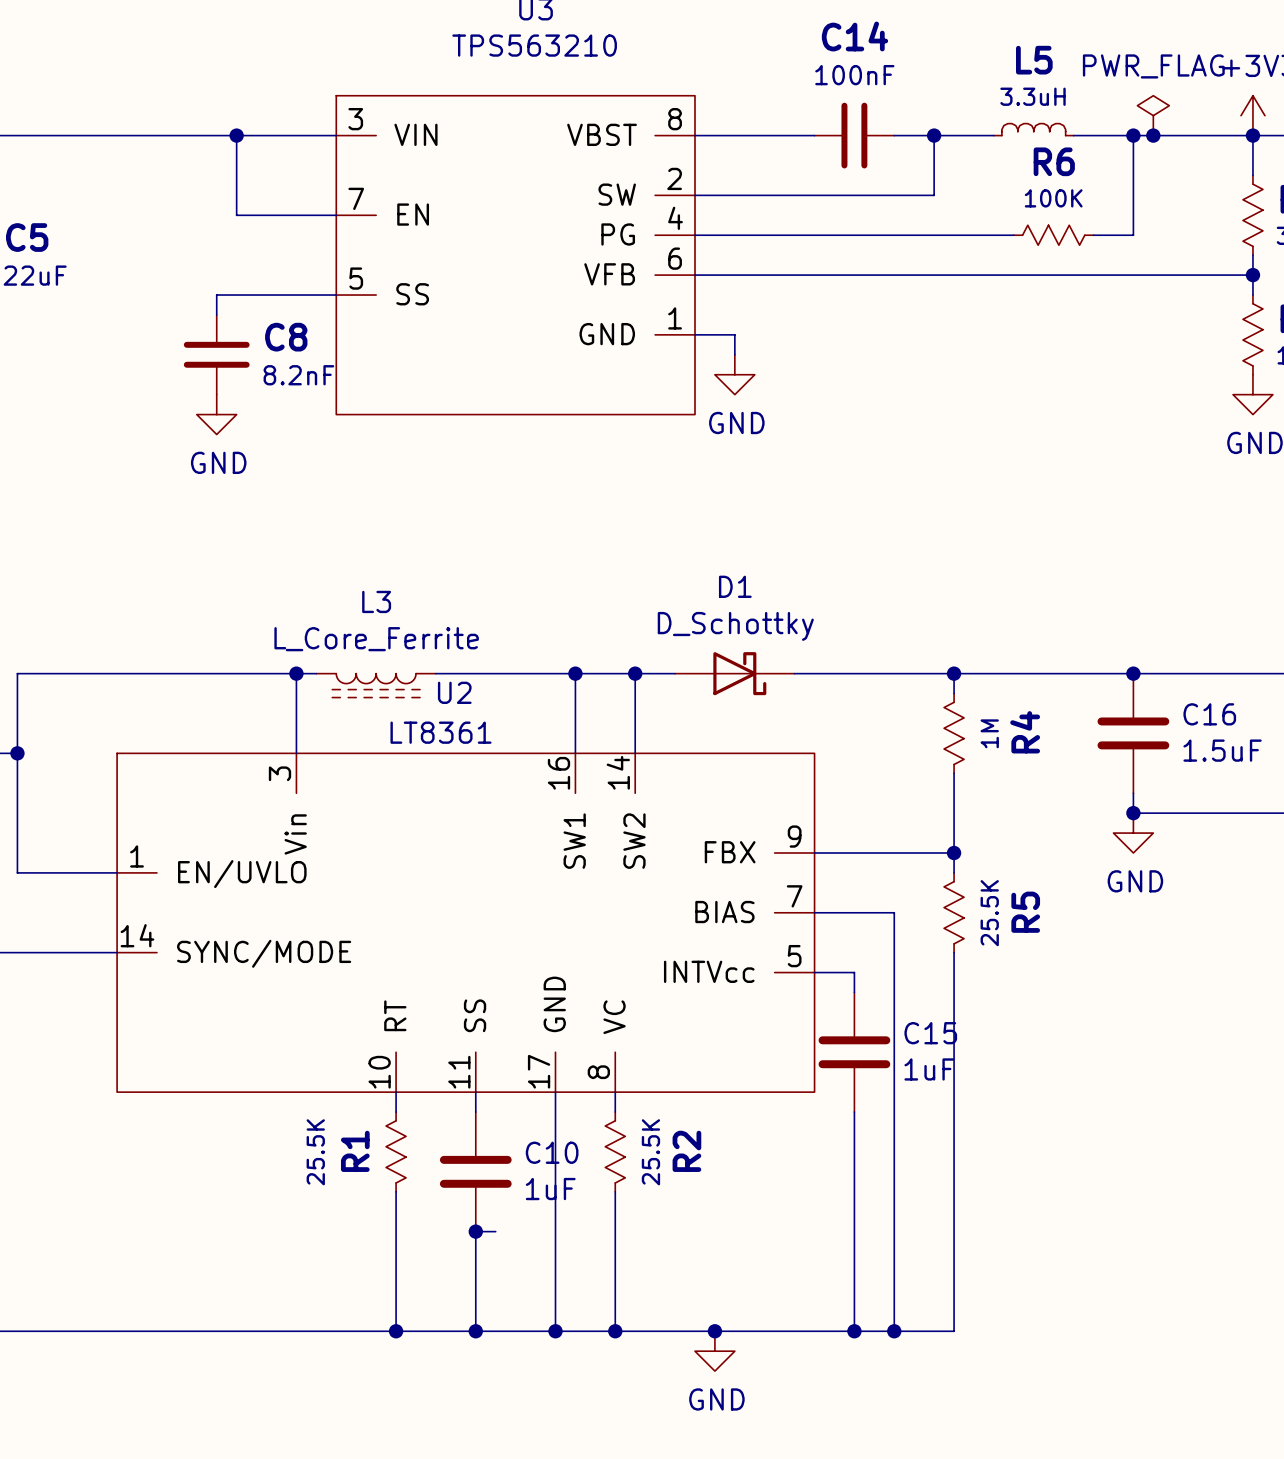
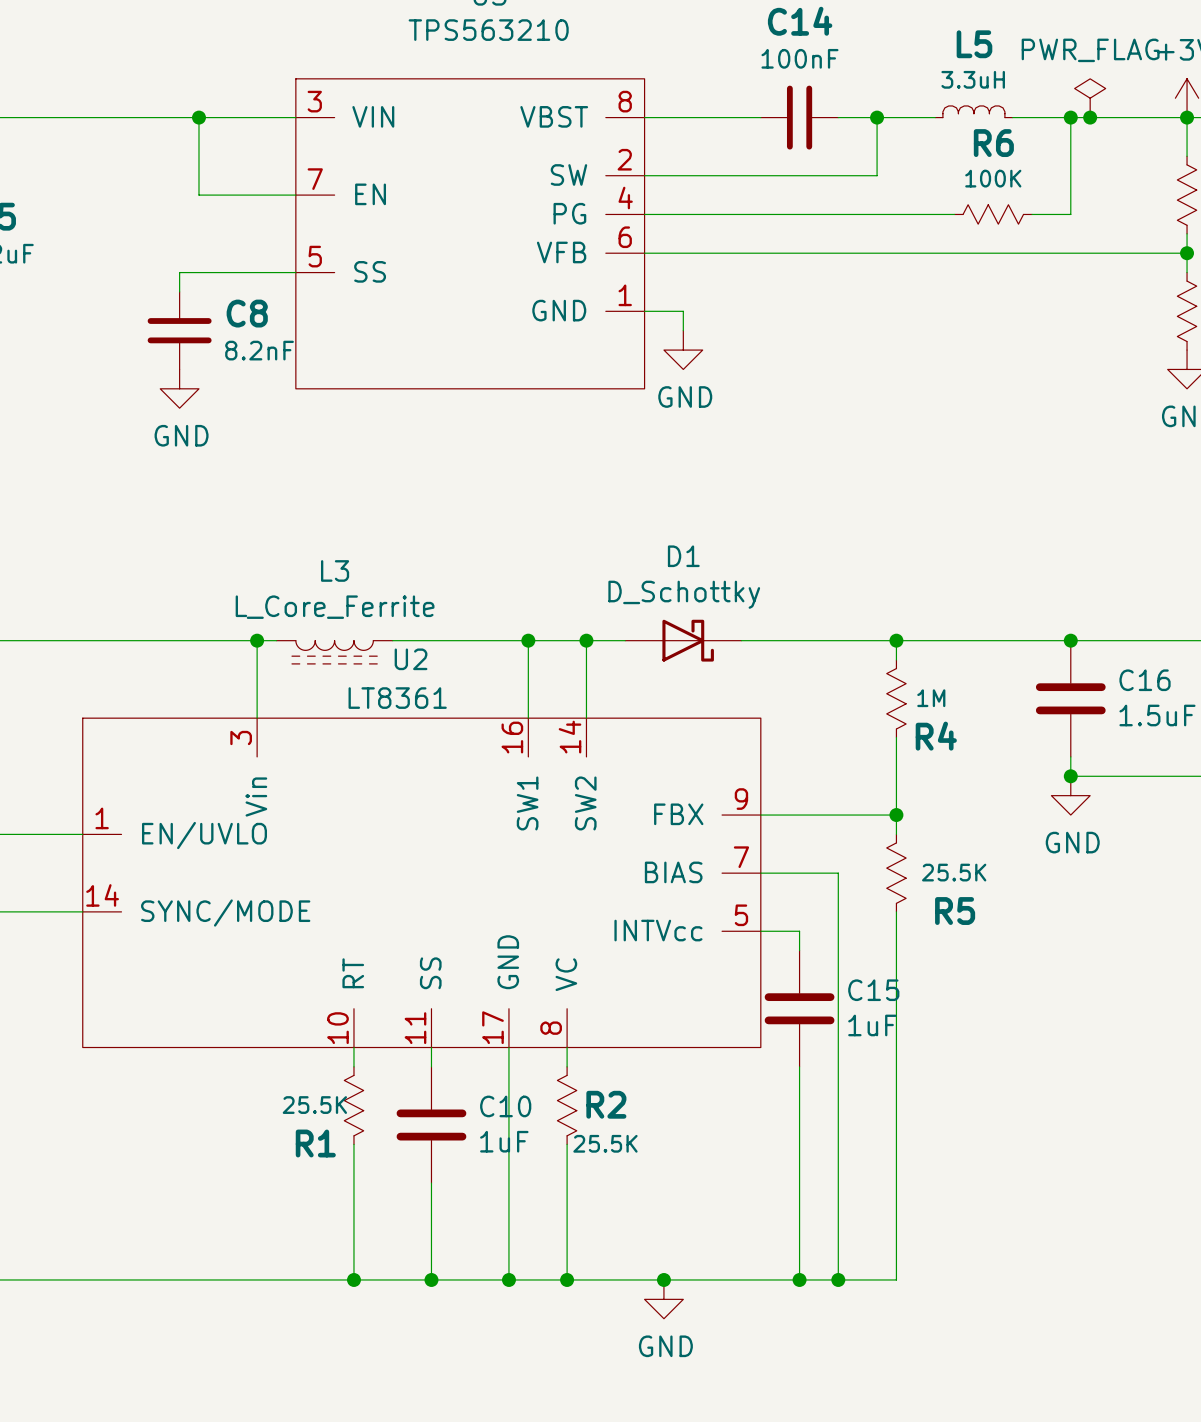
R4 name rotation: 0° (1025, 732) -> 90° clockwise (936, 736)
R4 value rotation: 0° (989, 733) -> 90° clockwise (931, 698)
R5 name rotation: 0° (1025, 912) -> 90° clockwise (955, 911)
R5 value rotation: 0° (989, 913) -> 90° clockwise (954, 872)
R1 name rotation: 0° (355, 1151) -> 90° clockwise (315, 1143)
R2 name rotation: 0° (686, 1151) -> 90° clockwise (606, 1104)
R1 value rotation: 0° (315, 1152) -> 90° clockwise (314, 1105)
R2 value rotation: 0° (650, 1152) -> 90° clockwise (605, 1143)
wire: (475, 1231) (495, 1231) -> none
junction: (475, 1231) -> none

